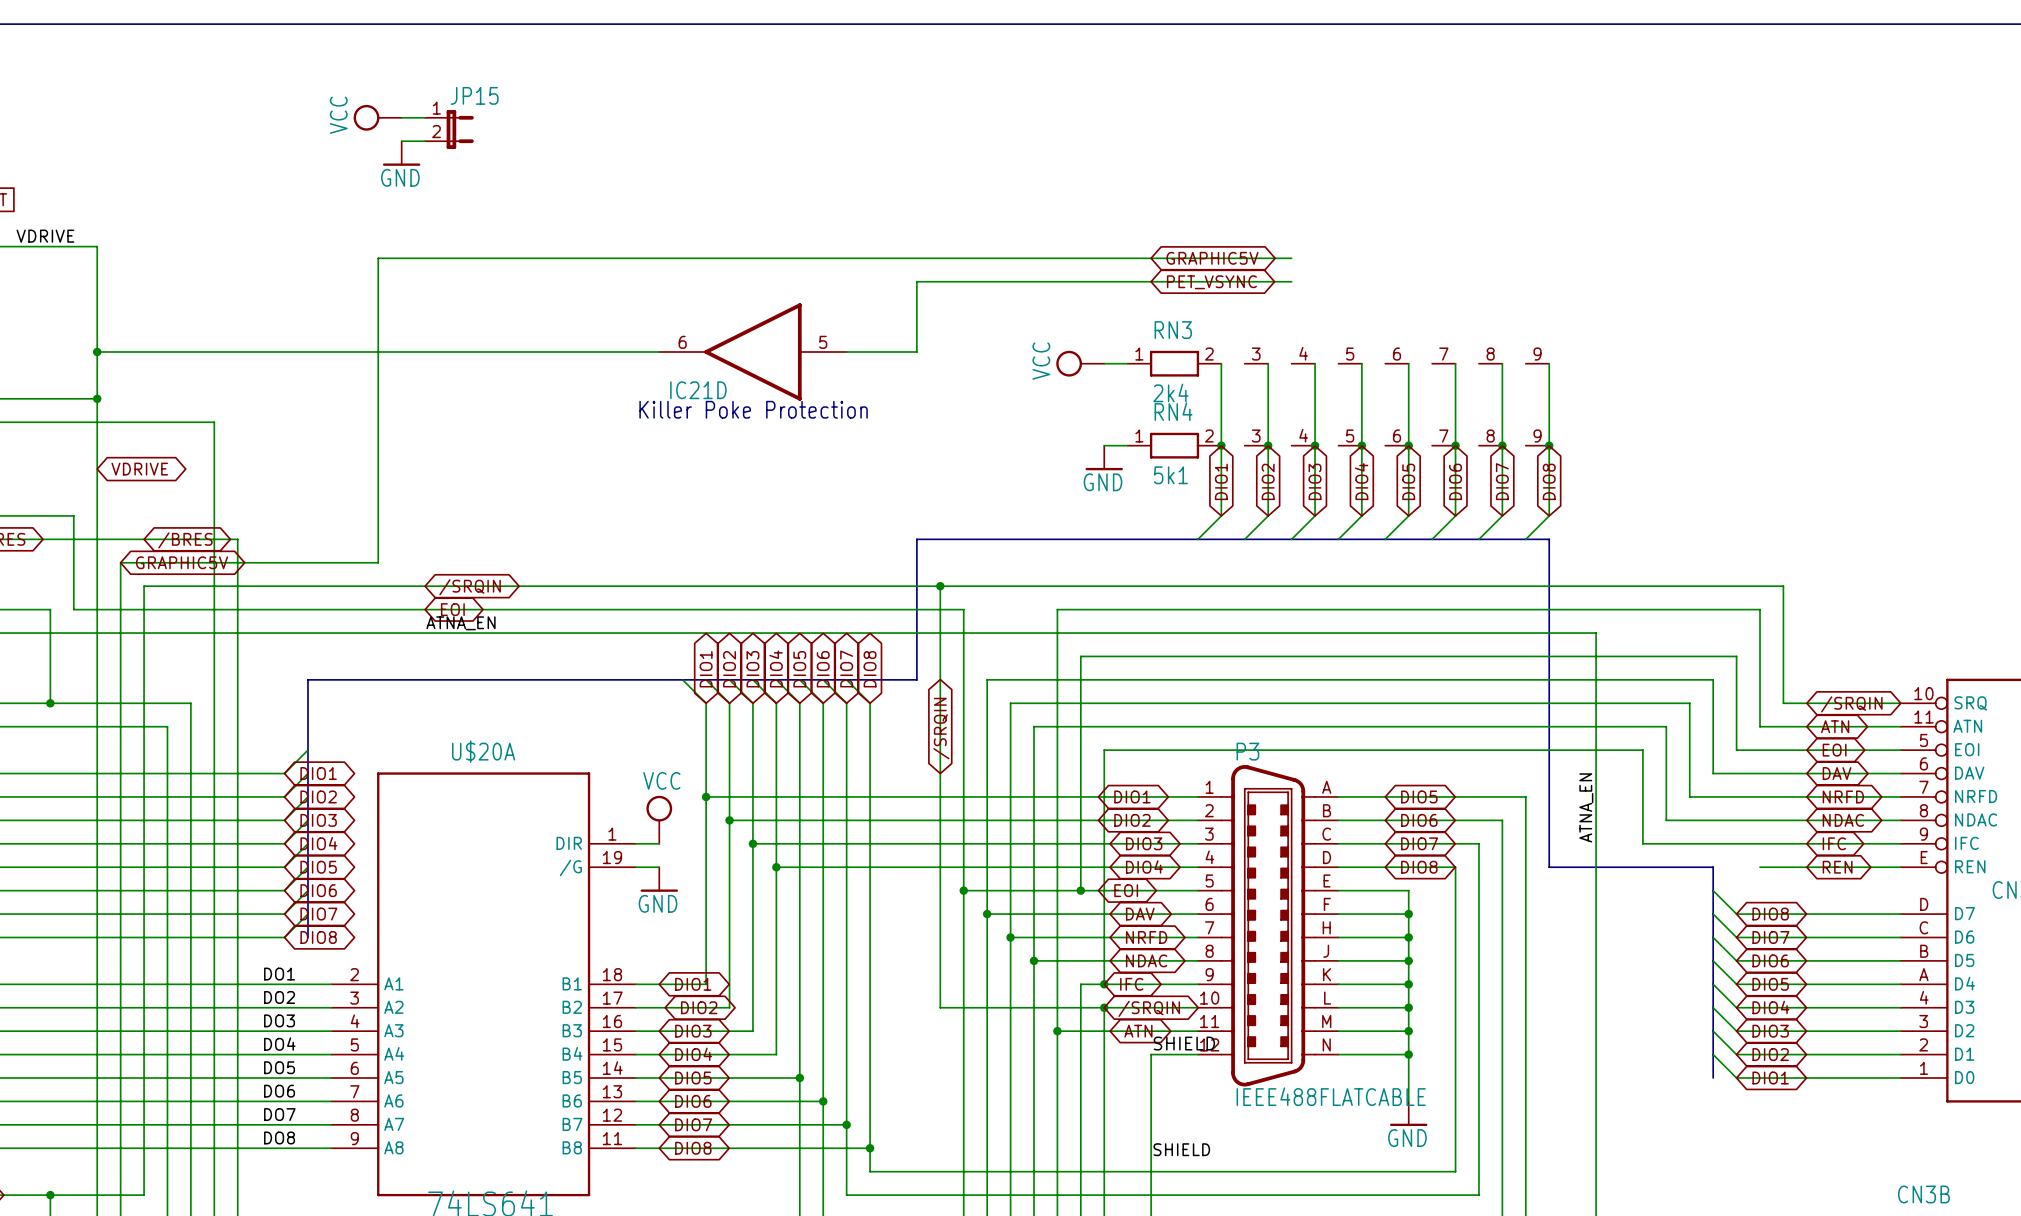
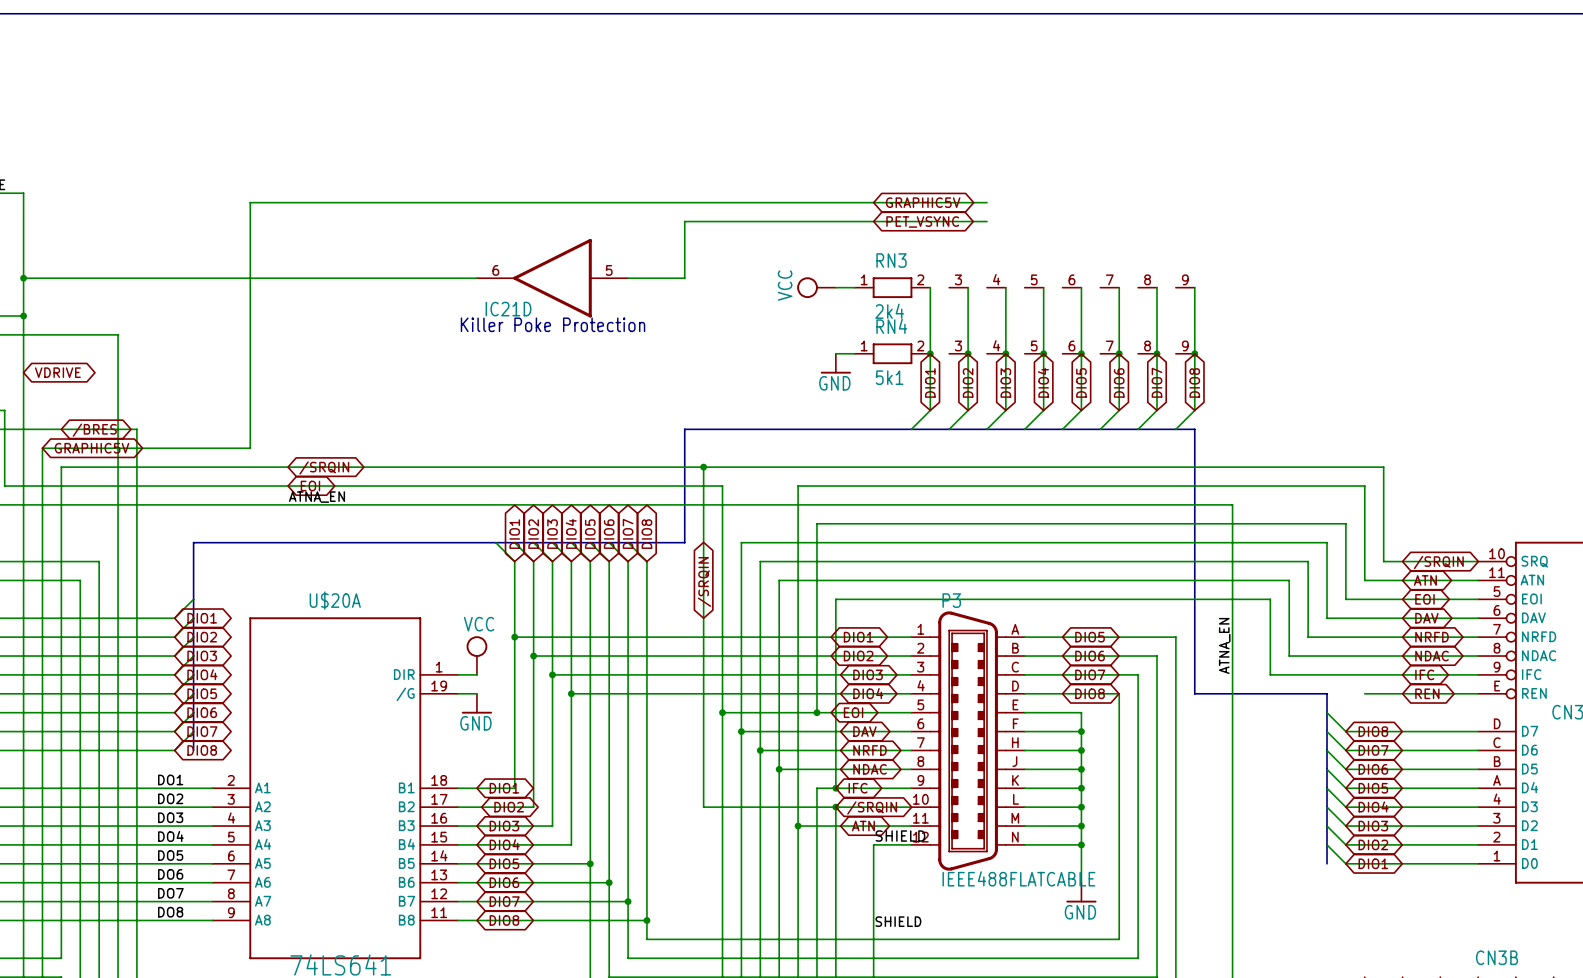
power symbol: VCC (377, 117) -> none
wire: (401, 117) (425, 117) -> none
JP15: (449, 129) -> none
wire: (401, 141) (425, 141) -> none
power symbol: GND (401, 153) -> none

